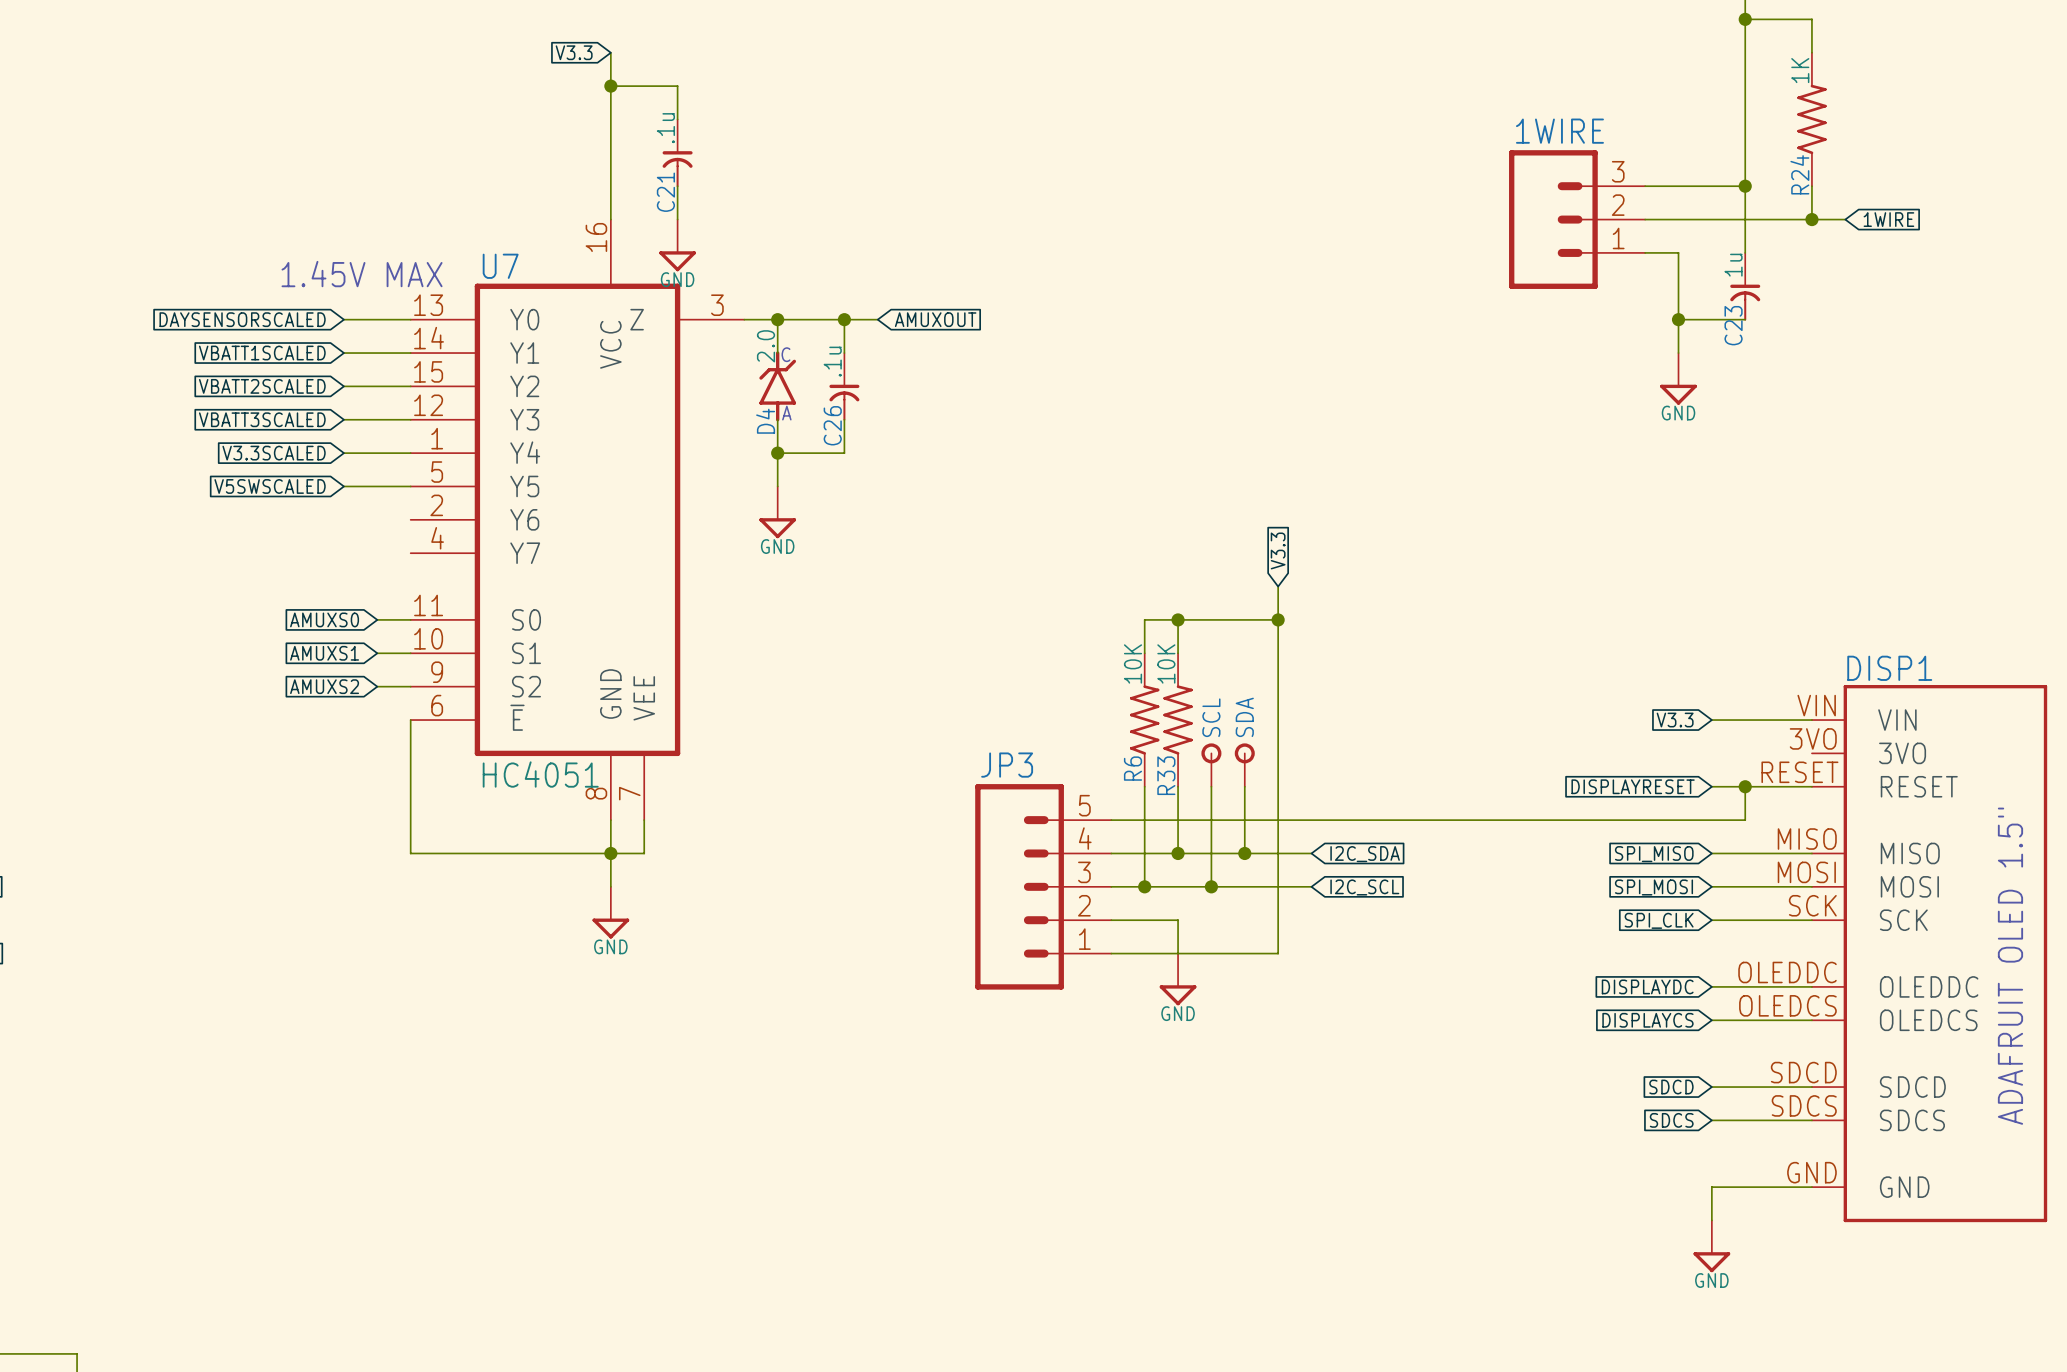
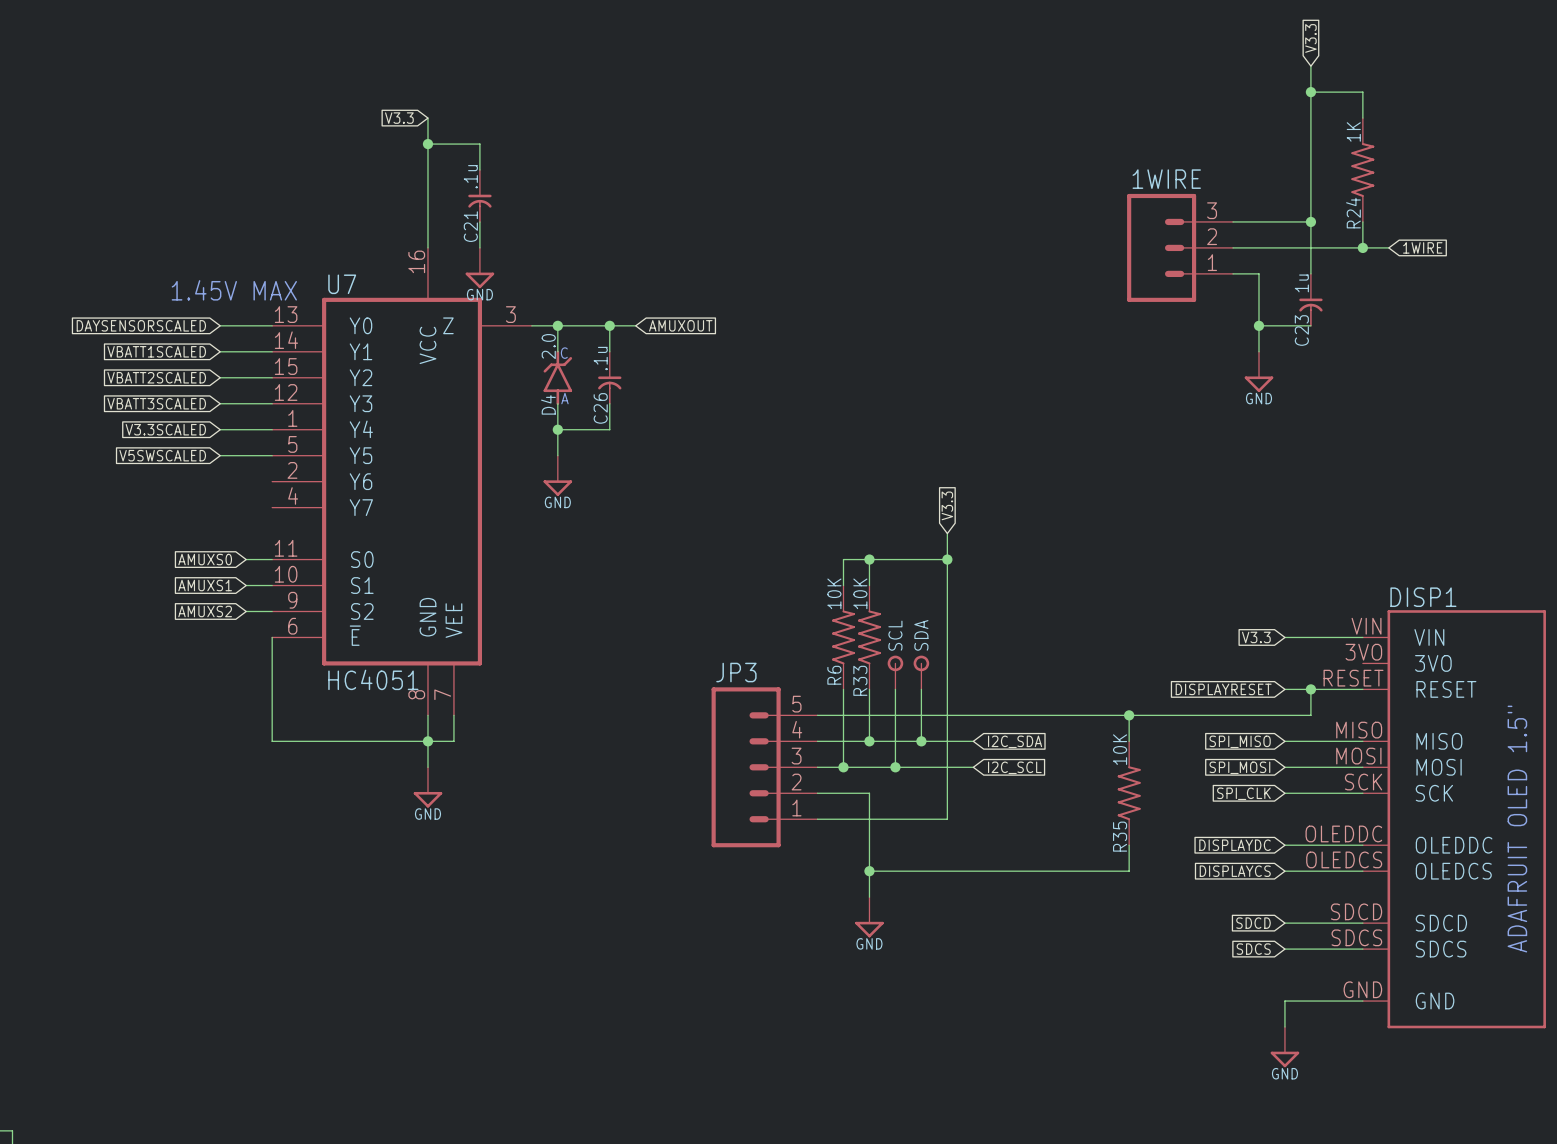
wire: none -> (1129, 715) (1129, 741)
junction: none -> (1129, 715)
R35: none -> 10K (1129, 793)
wire: none -> (869, 819) (869, 897)
power symbol position: GND (1178, 979) -> GND (869, 917)
wire: none -> (1129, 845) (1129, 871) (869, 871)
junction: none -> (869, 871)

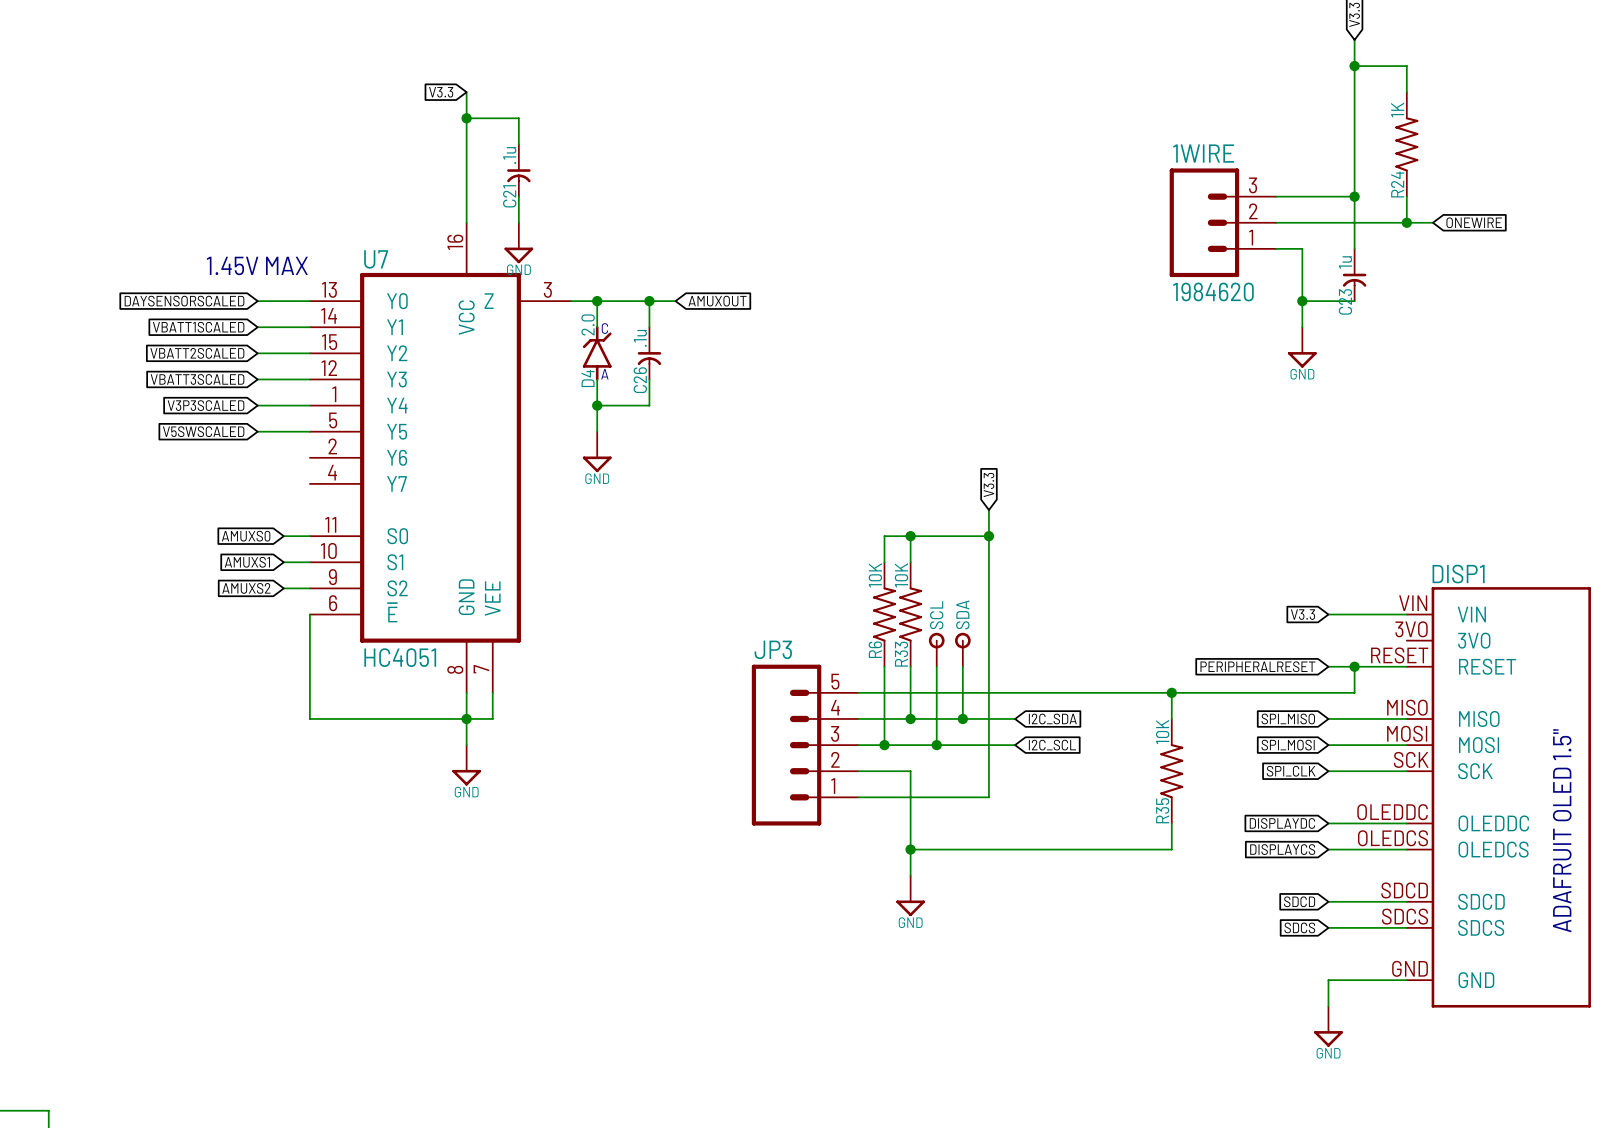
global label: 1WIRE (1422, 247) -> ONEWIRE (1474, 222)
1WIRE value: none -> 1984620 (1213, 291)
global label: V3.3SCALED (165, 429) -> V3P3SCALED (206, 405)
global label: DISPLAYRESET (1223, 689) -> PERIPHERALRESET (1257, 666)

